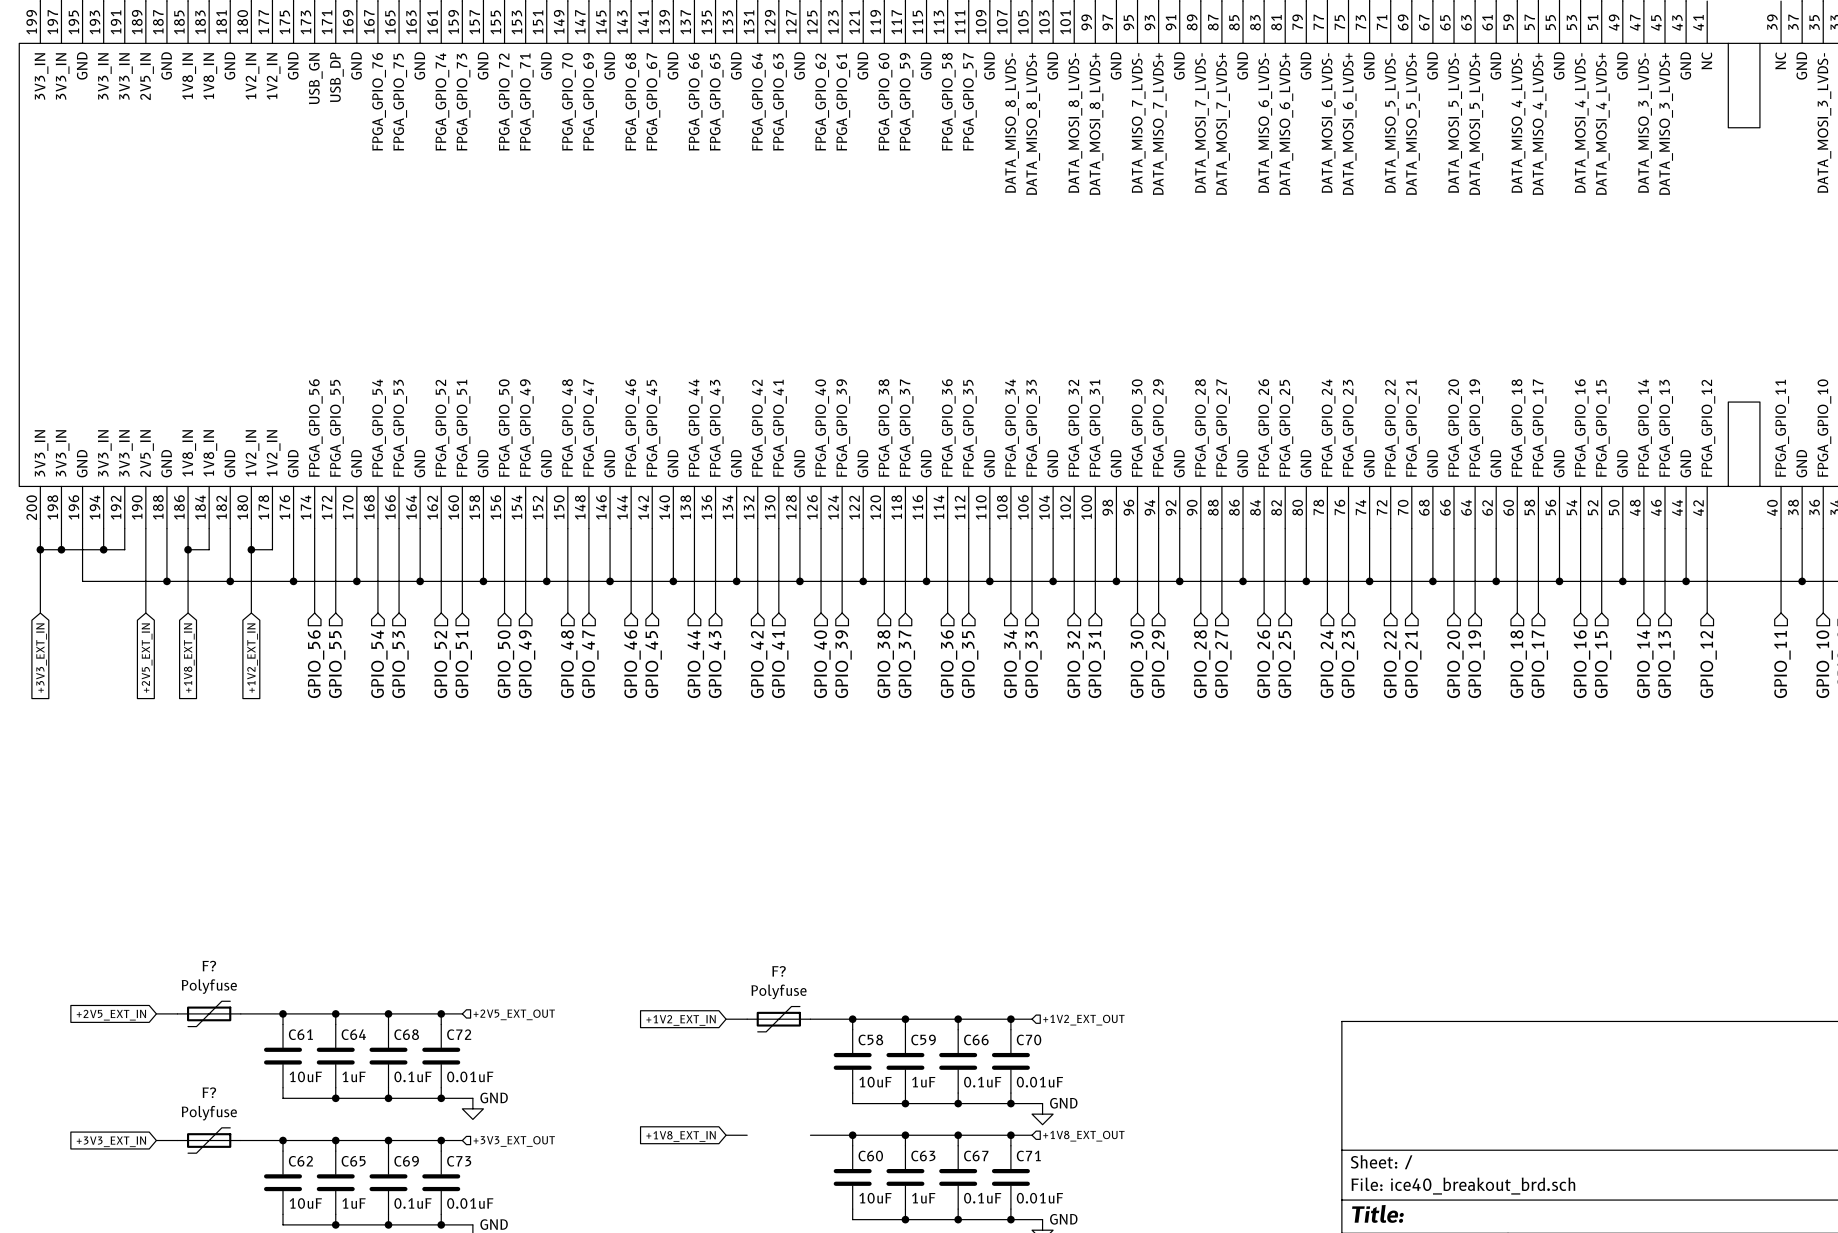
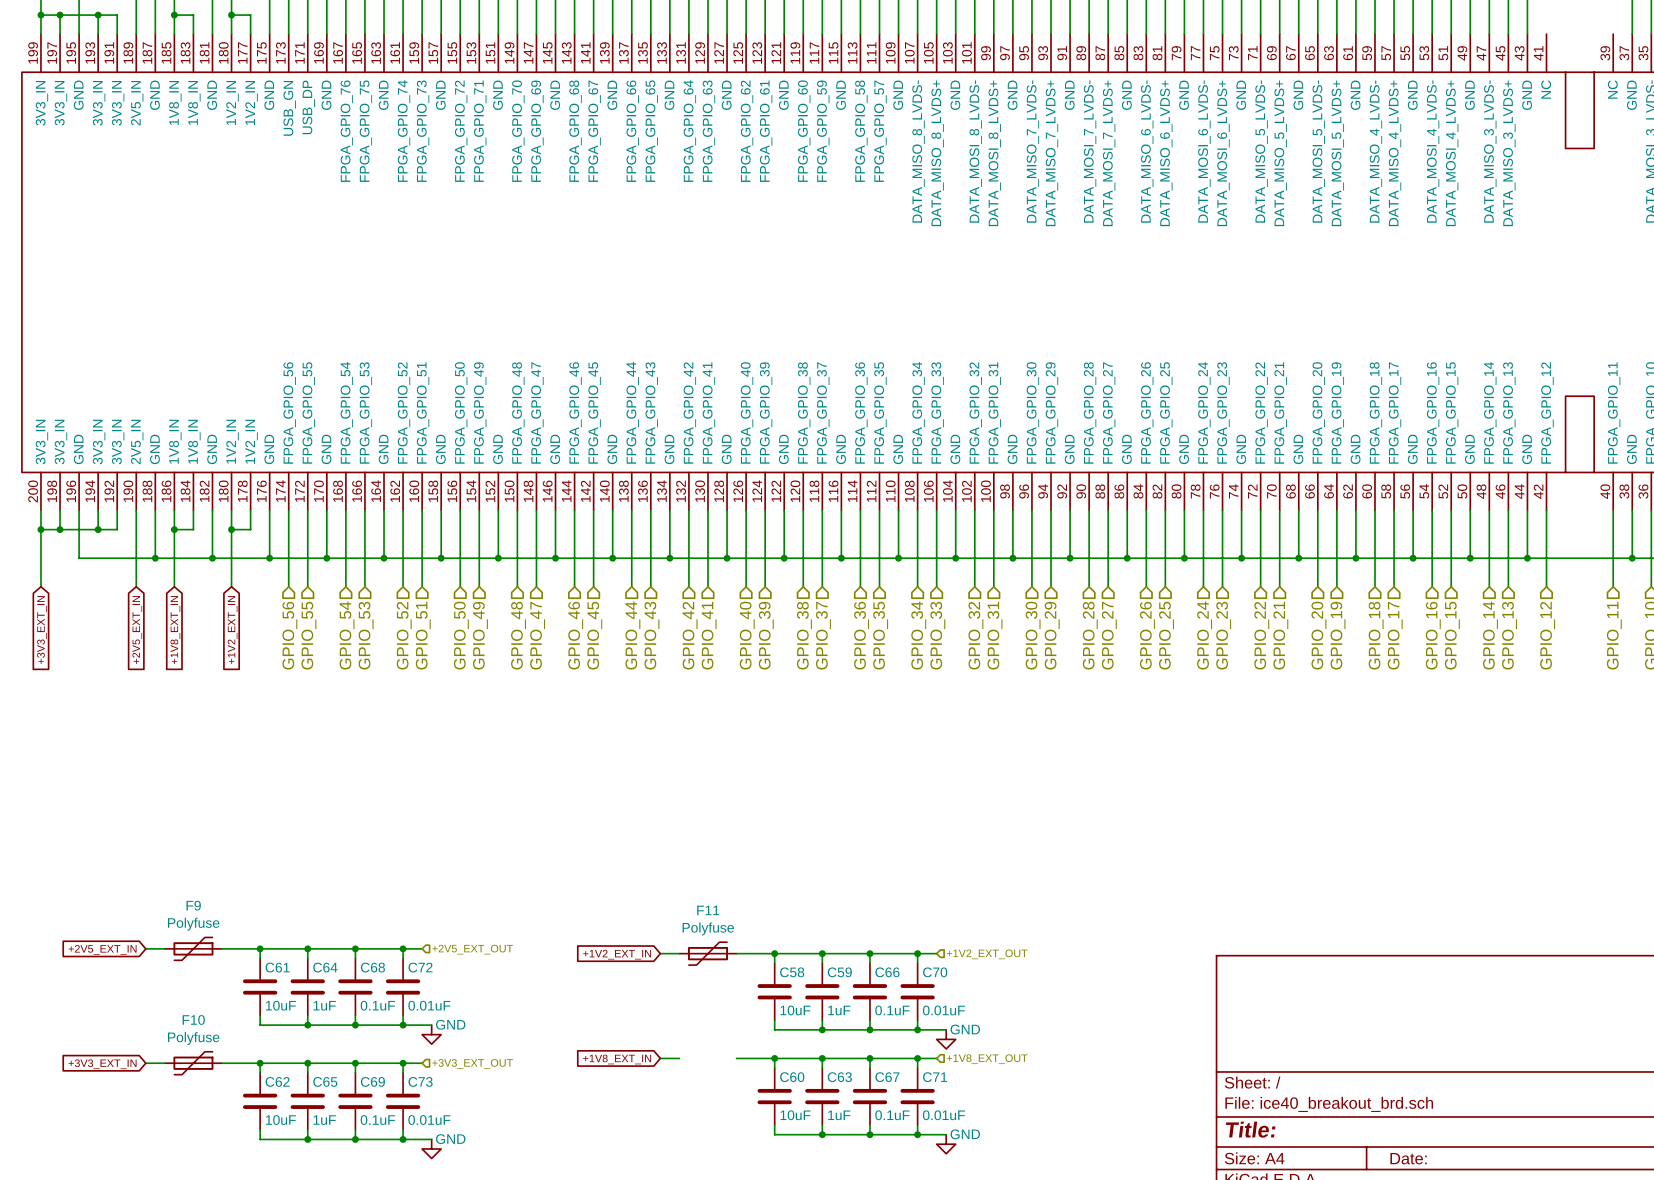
F? name: F? (209, 966) -> F9 (193, 905)
F? name: F? (779, 971) -> F11 (708, 910)
F? name: F? (209, 1092) -> F10 (193, 1019)

